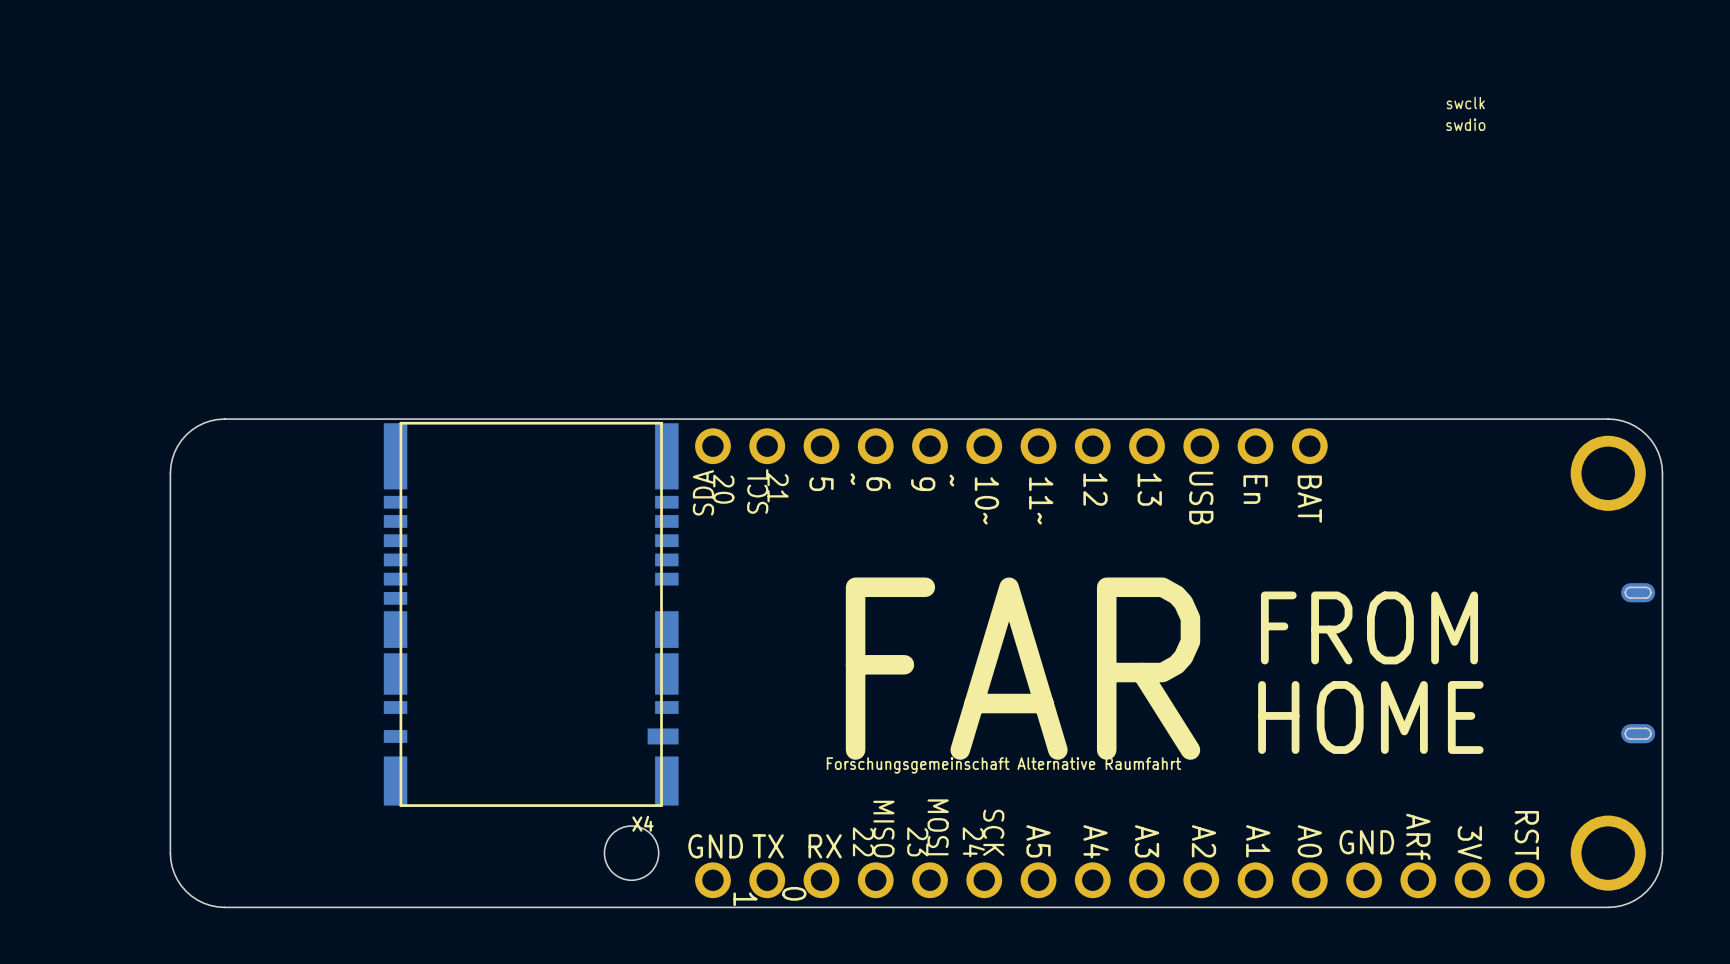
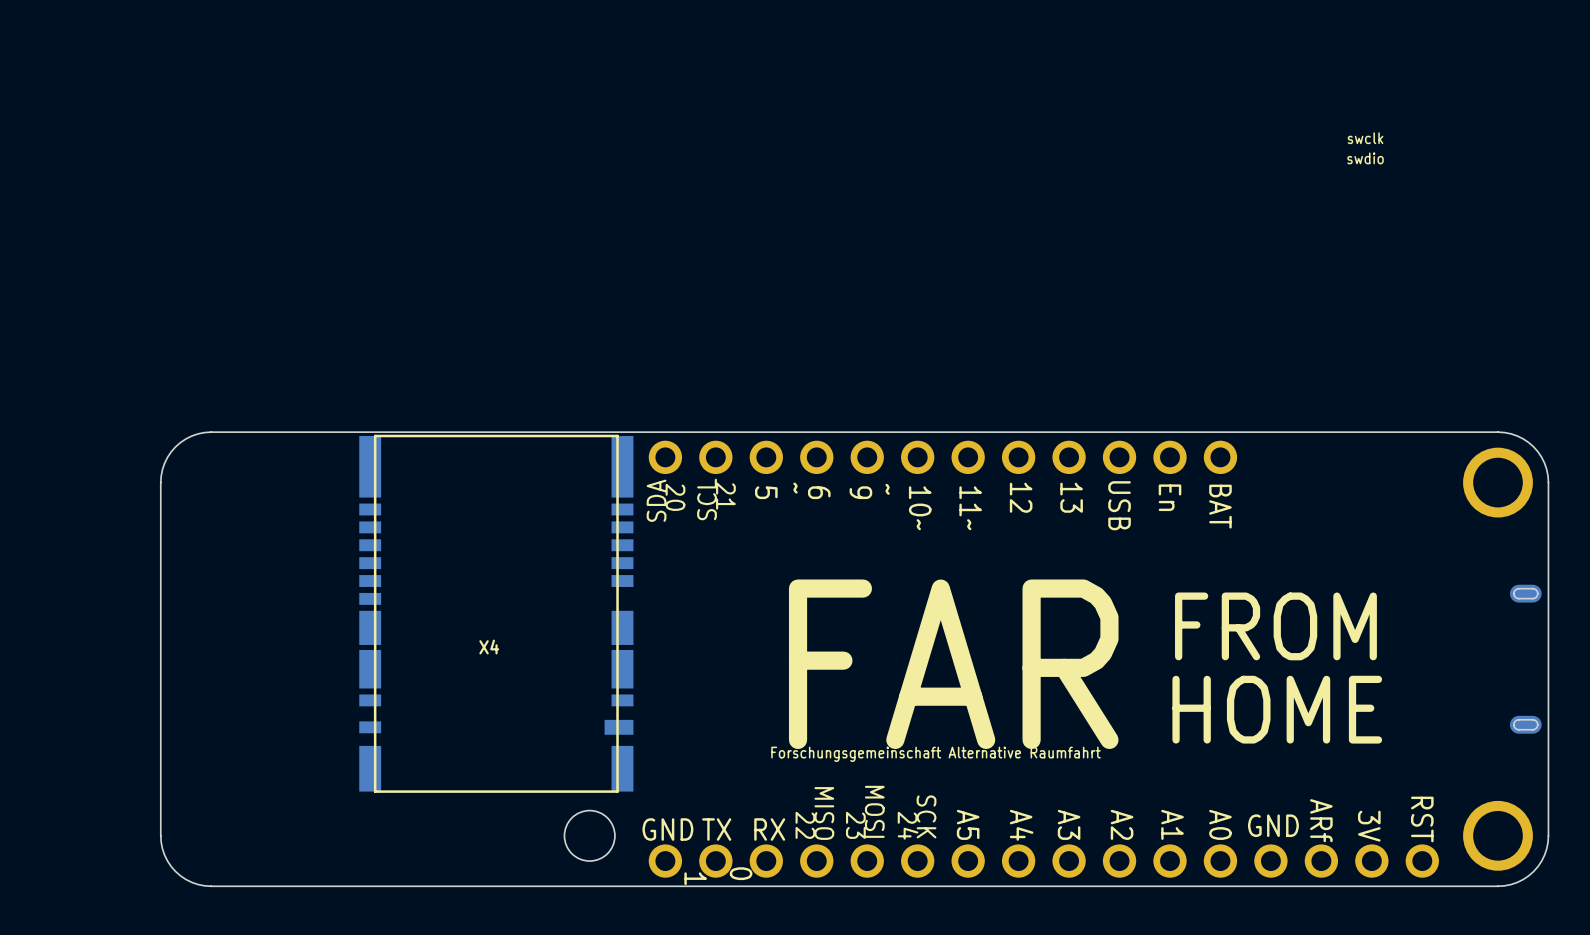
X4 name position: X4 (642, 823) -> X4 (489, 647)

